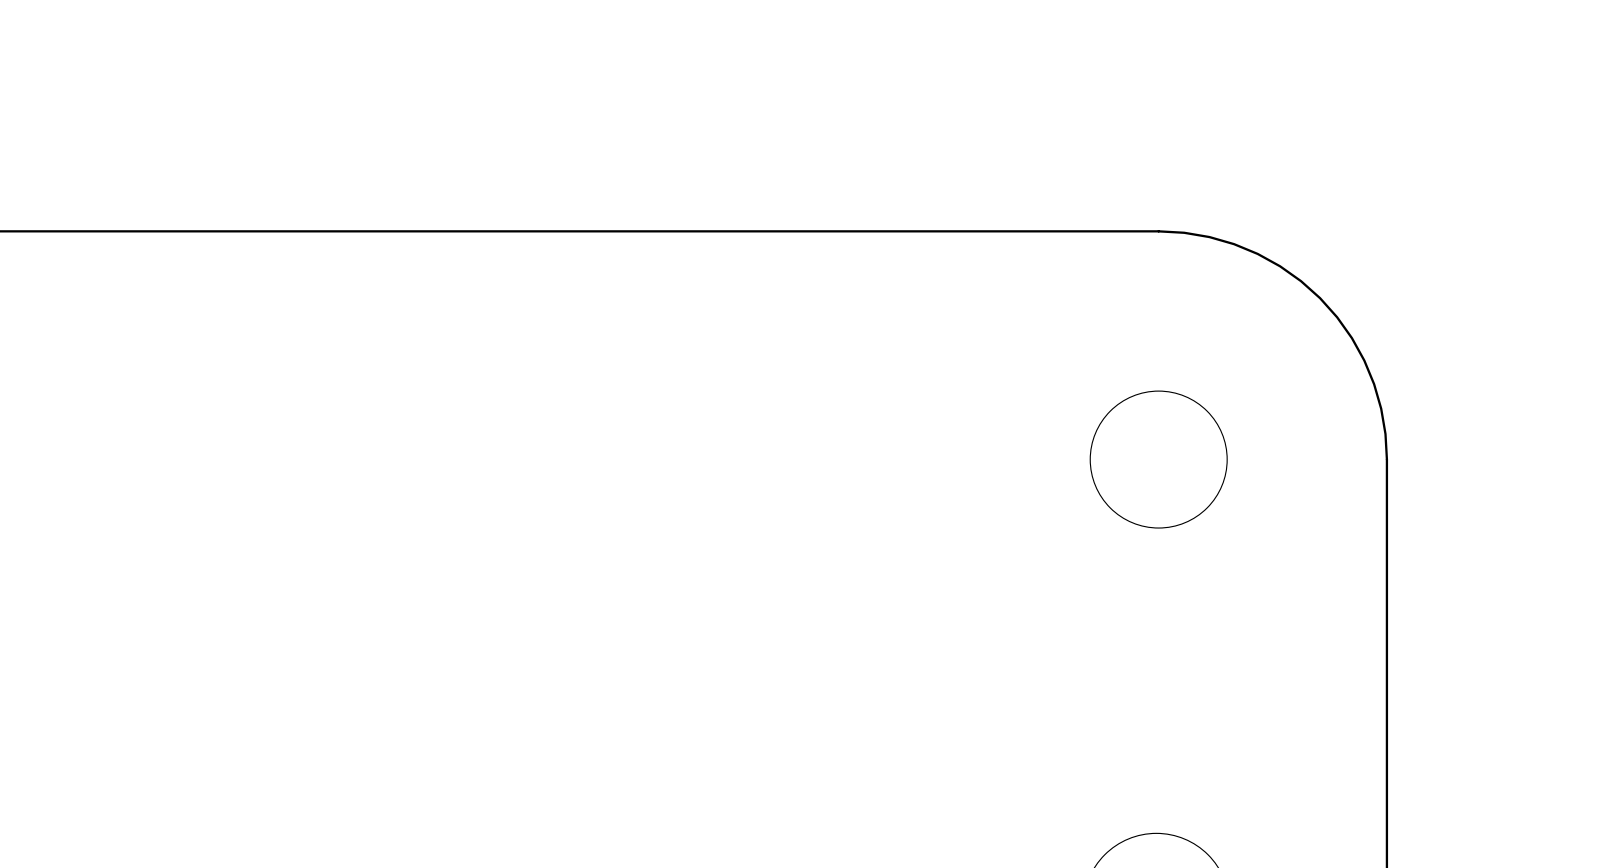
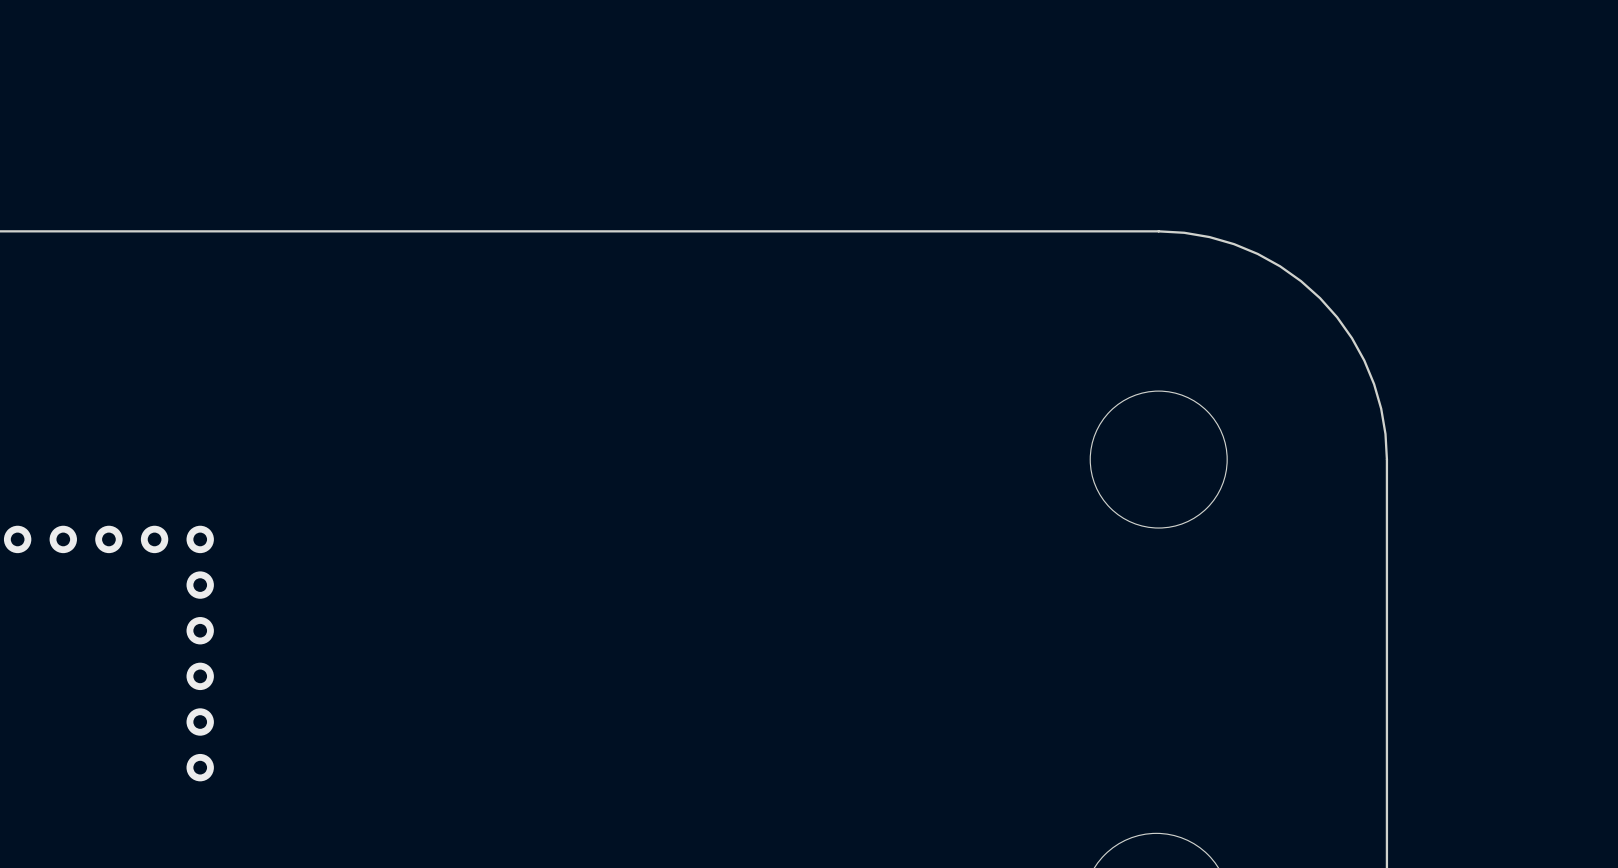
via: none -> (17, 539)
via: none -> (63, 539)
via: none -> (108, 539)
via: none -> (154, 539)
via: none -> (200, 539)
via: none -> (200, 585)
via: none -> (200, 630)
via: none -> (200, 676)
via: none -> (200, 722)
via: none -> (200, 767)

